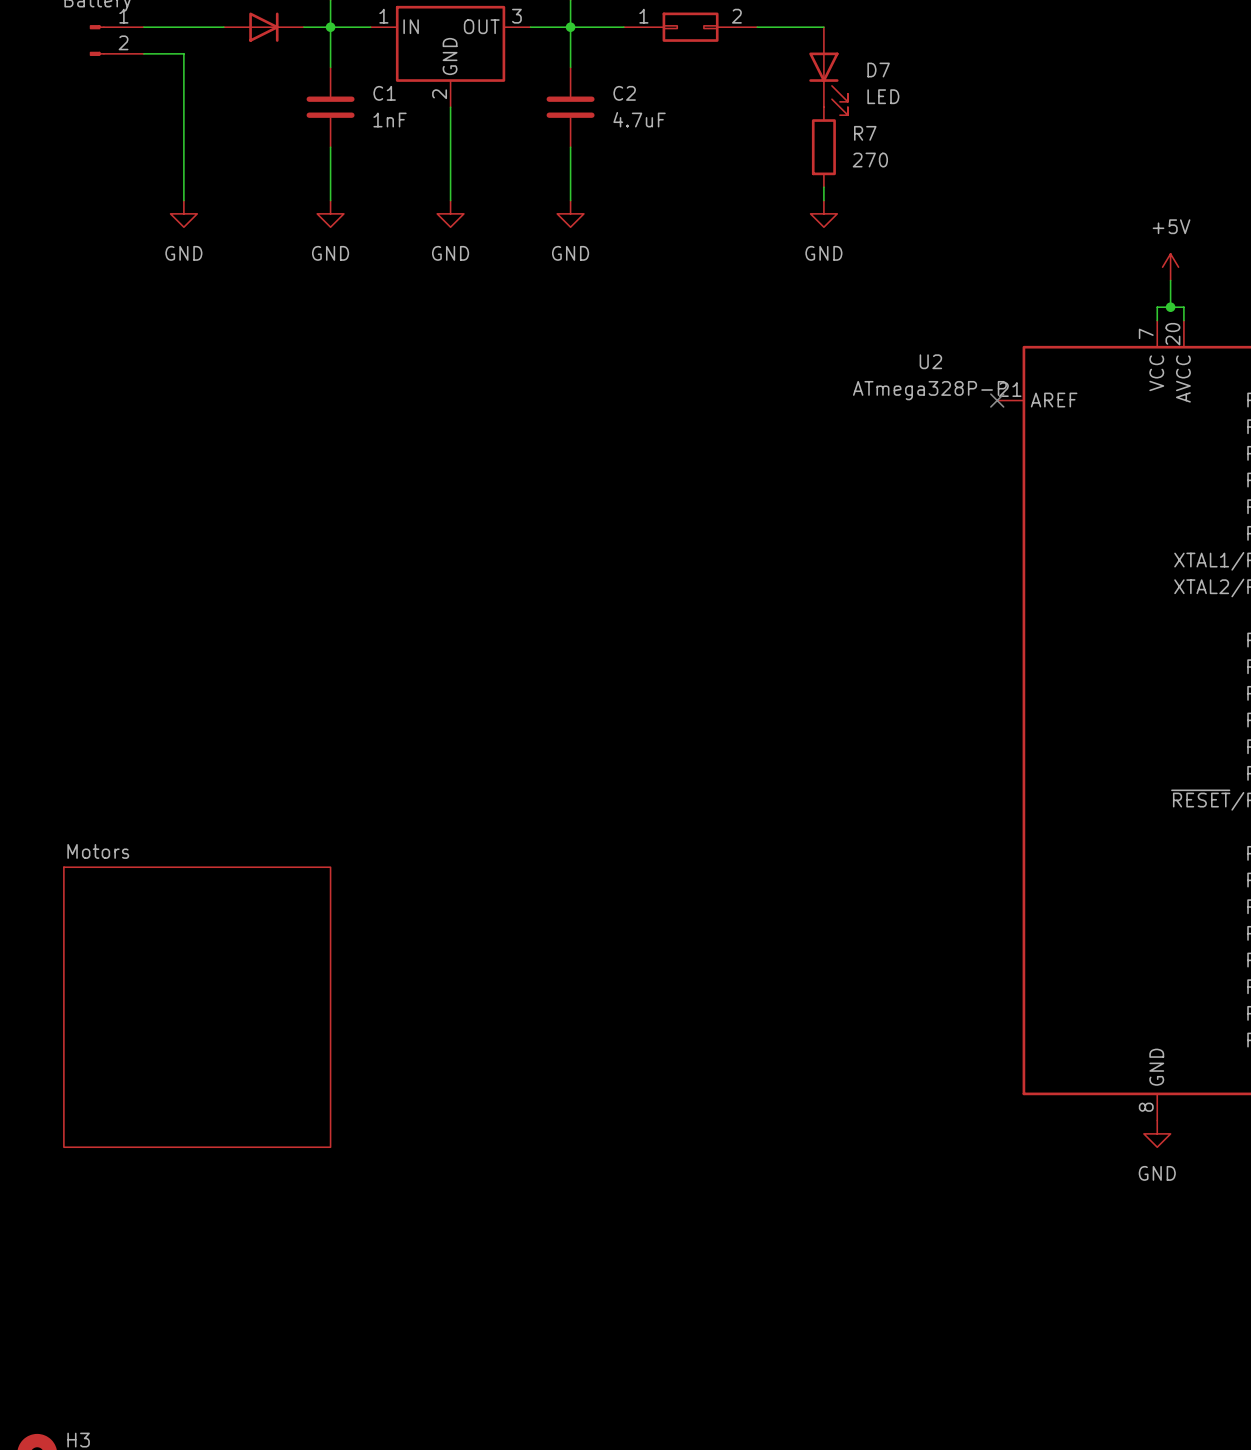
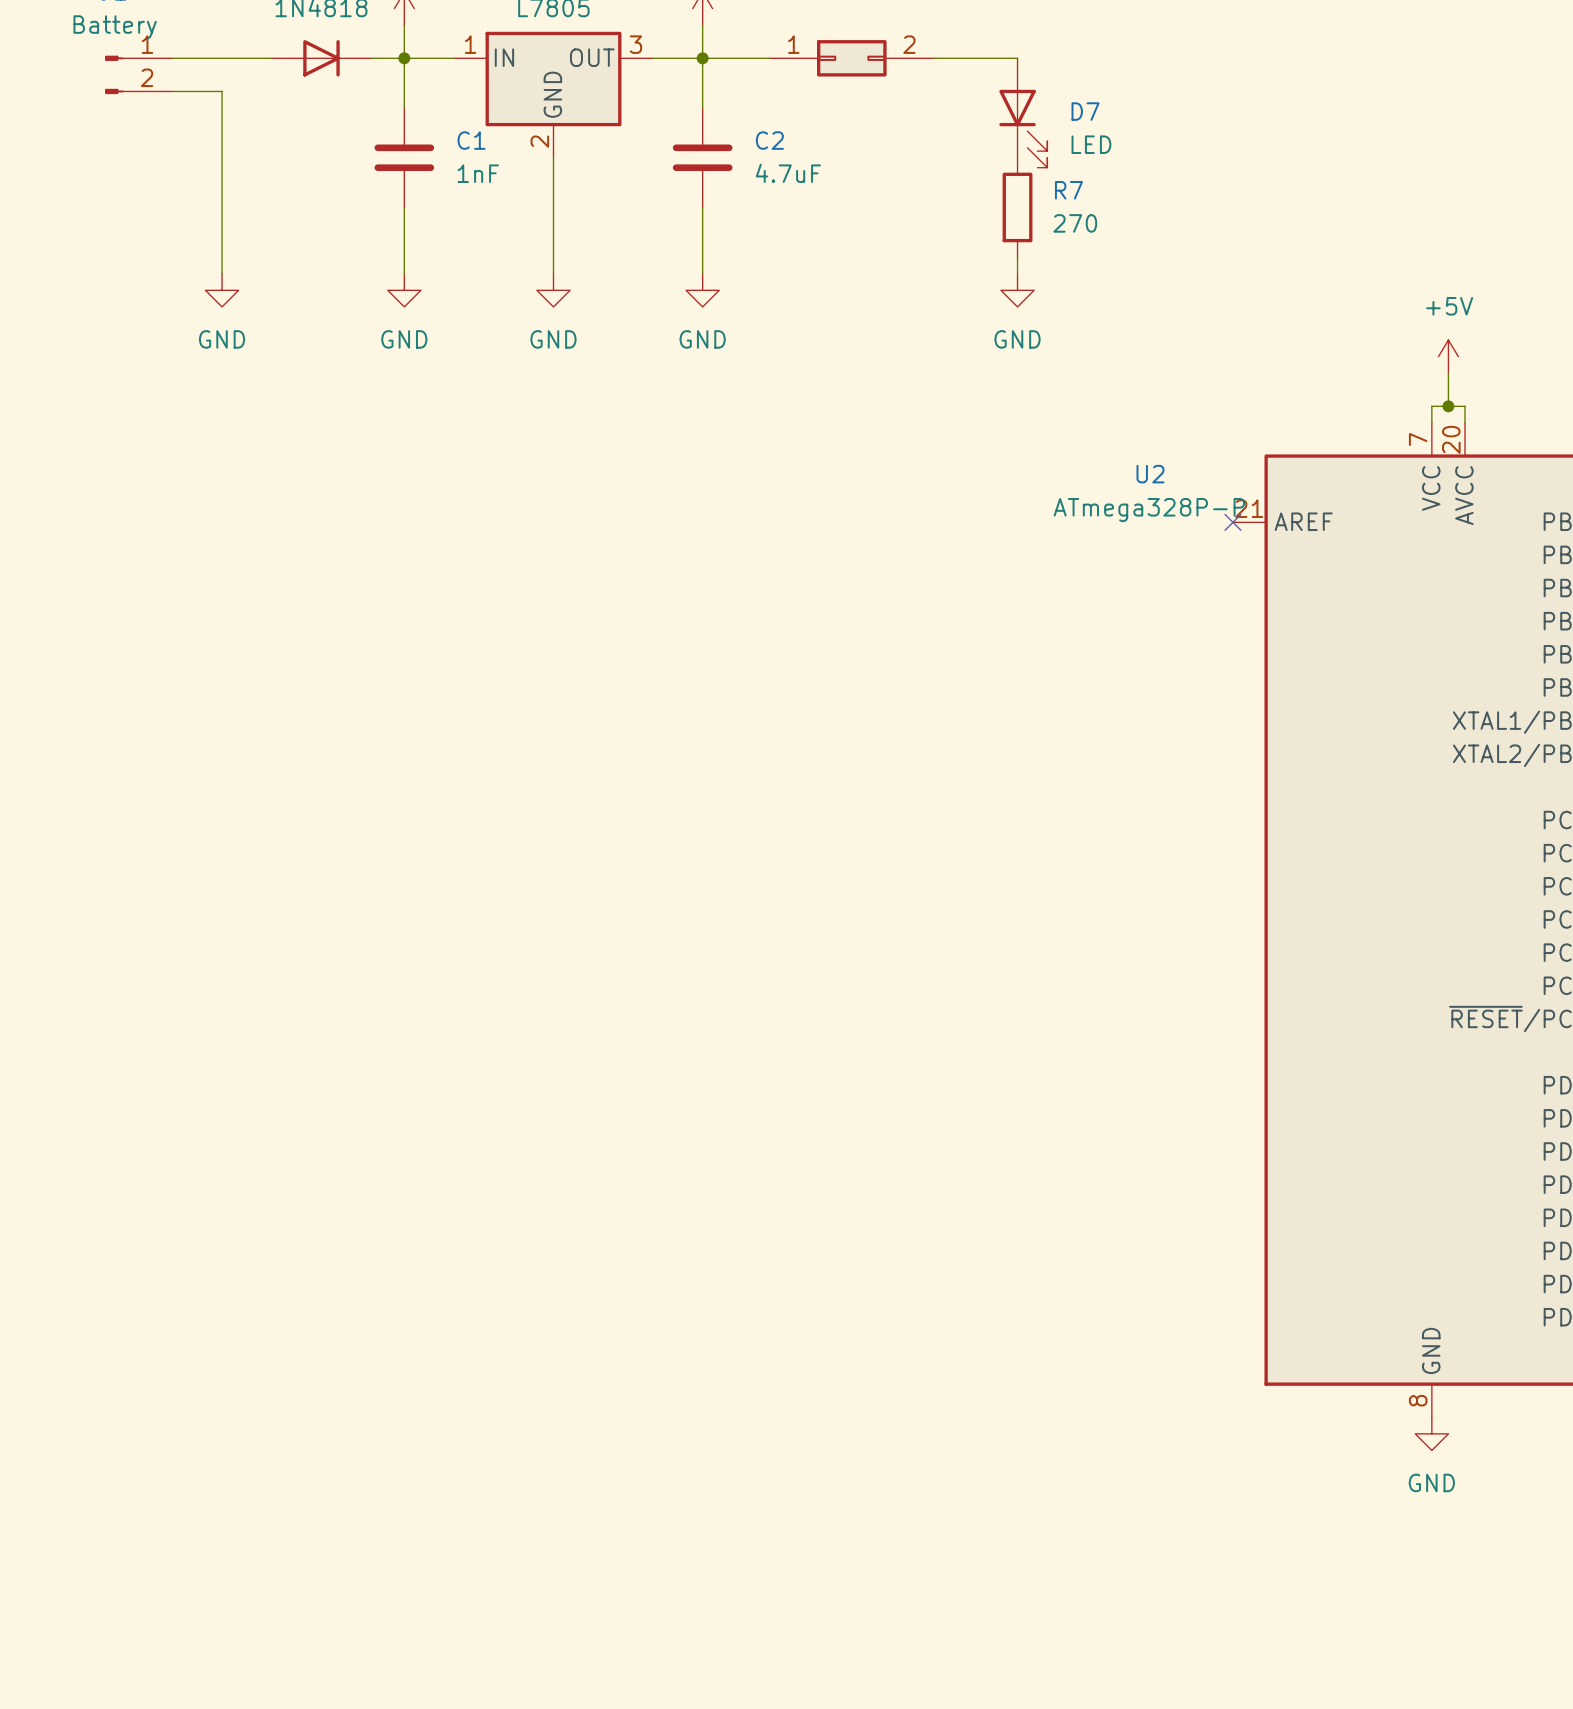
sheet Motors: (197, 1007) -> none

